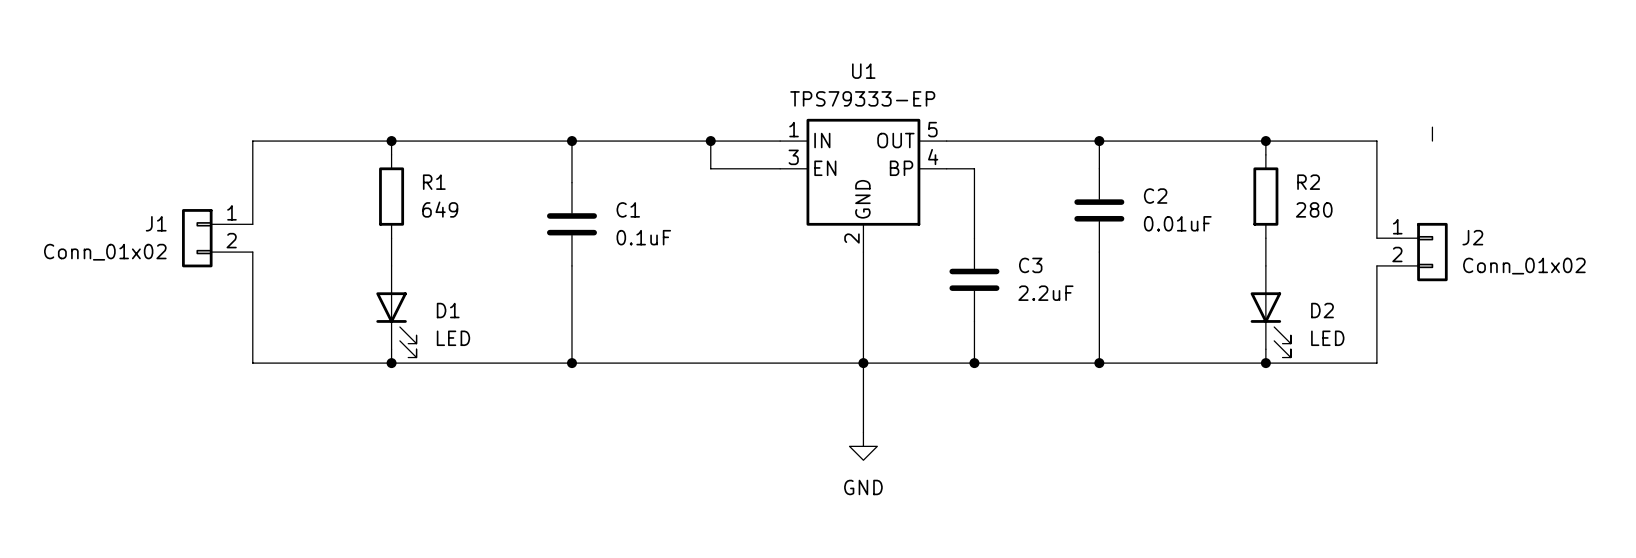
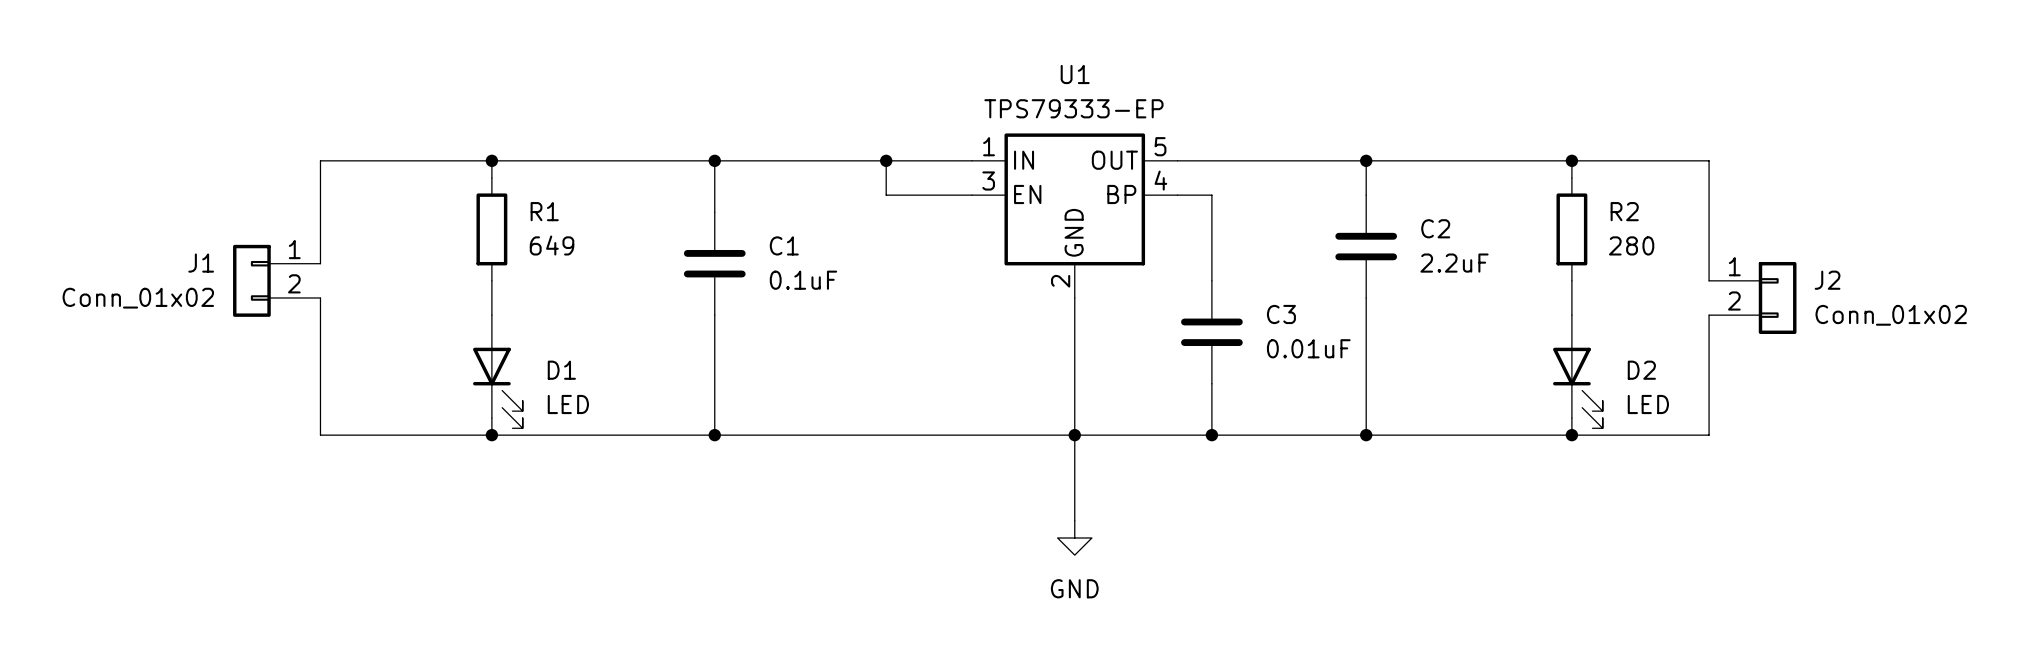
wire: (1432, 127) (1432, 141) -> none
C2 value: 0.01uF (1177, 223) -> 2.2uF (1454, 263)
C3 value: 2.2uF (1045, 293) -> 0.01uF (1308, 348)

